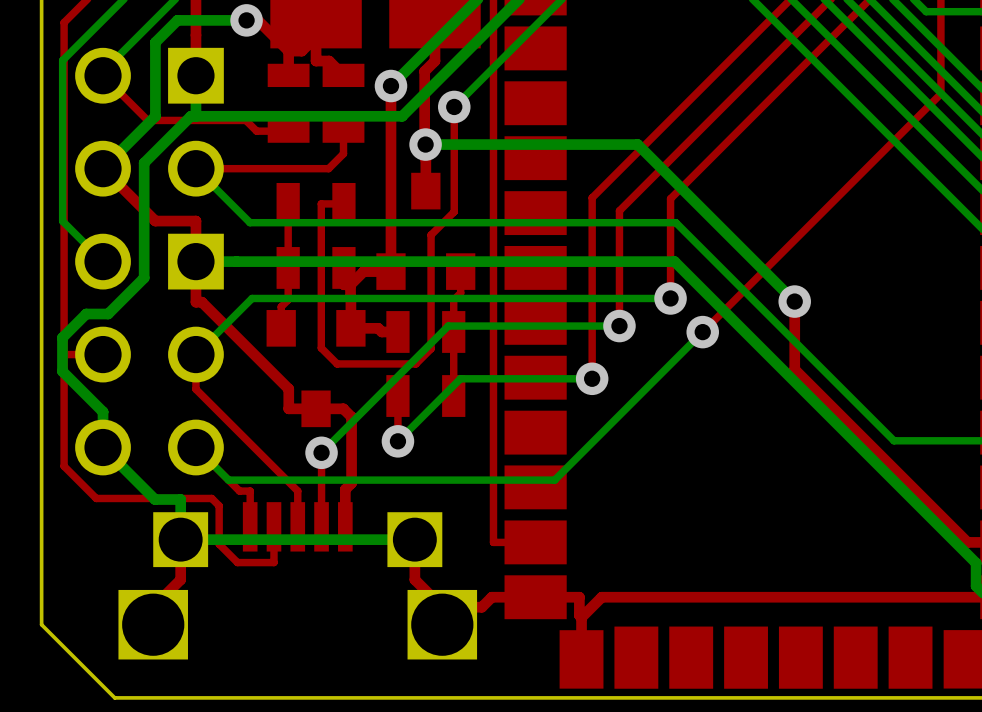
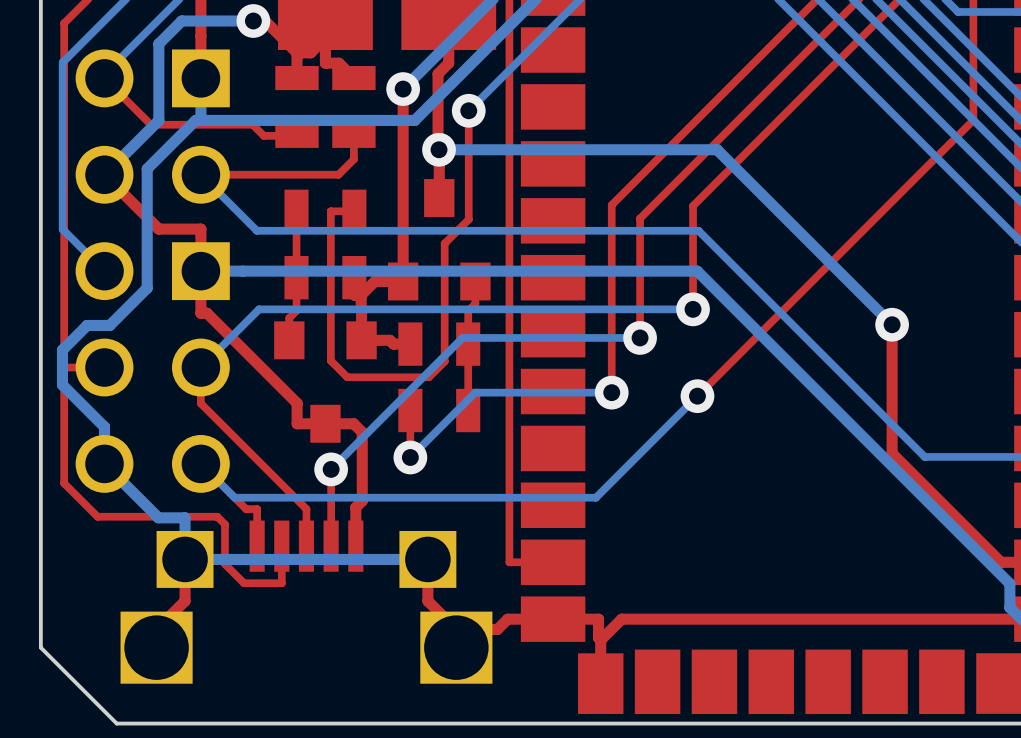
top track: (940, 93) (702, 332) -> (973, 97) (973, 120) (697, 396)
bottom track: (637, 144) (794, 301) -> (658, 149) (717, 149) (892, 324)
top track: (794, 301) (794, 369) (862, 437) -> (892, 324) (892, 453)
via position: (794, 301) -> (892, 324)
bottom track: (702, 332) (554, 480) -> (697, 396) (595, 497) (572, 497)
via position: (702, 332) -> (697, 396)

